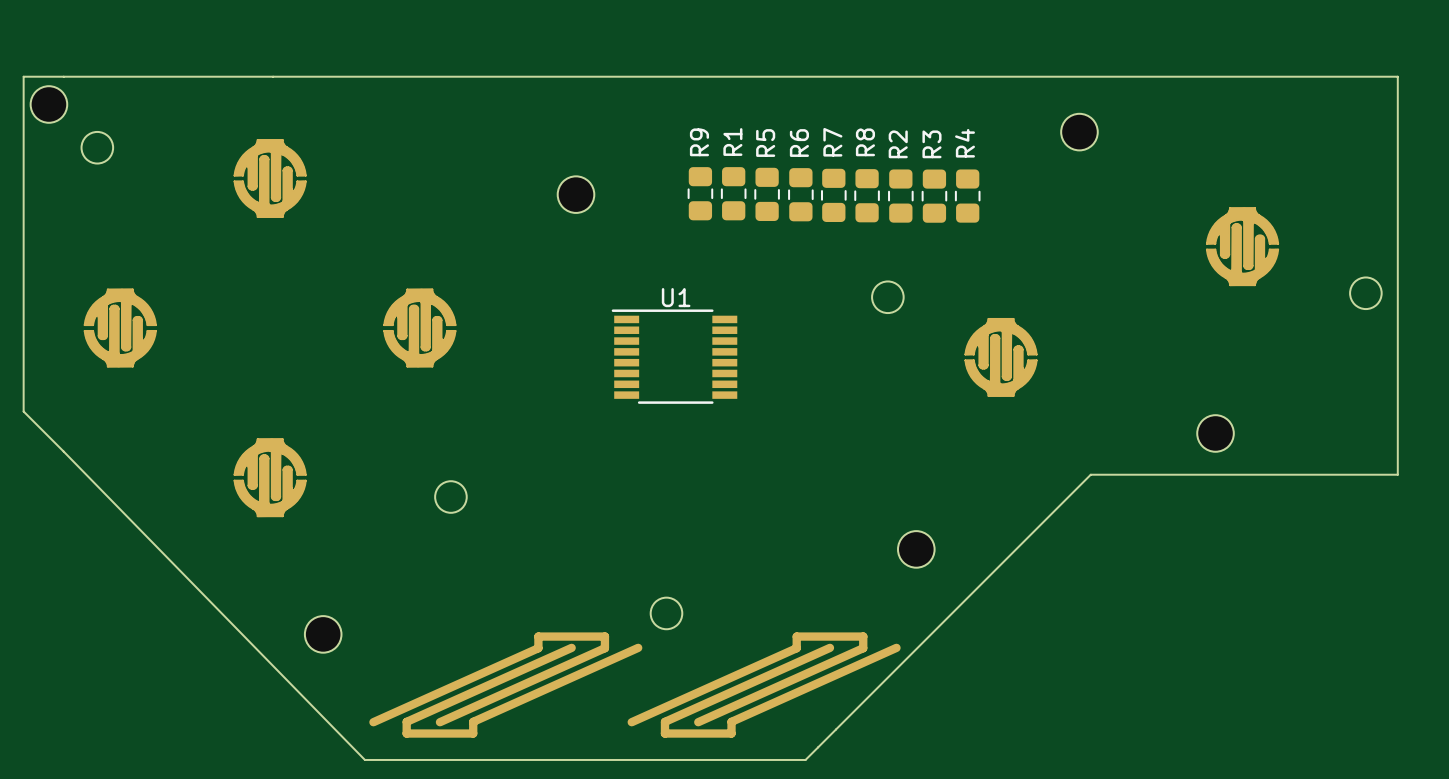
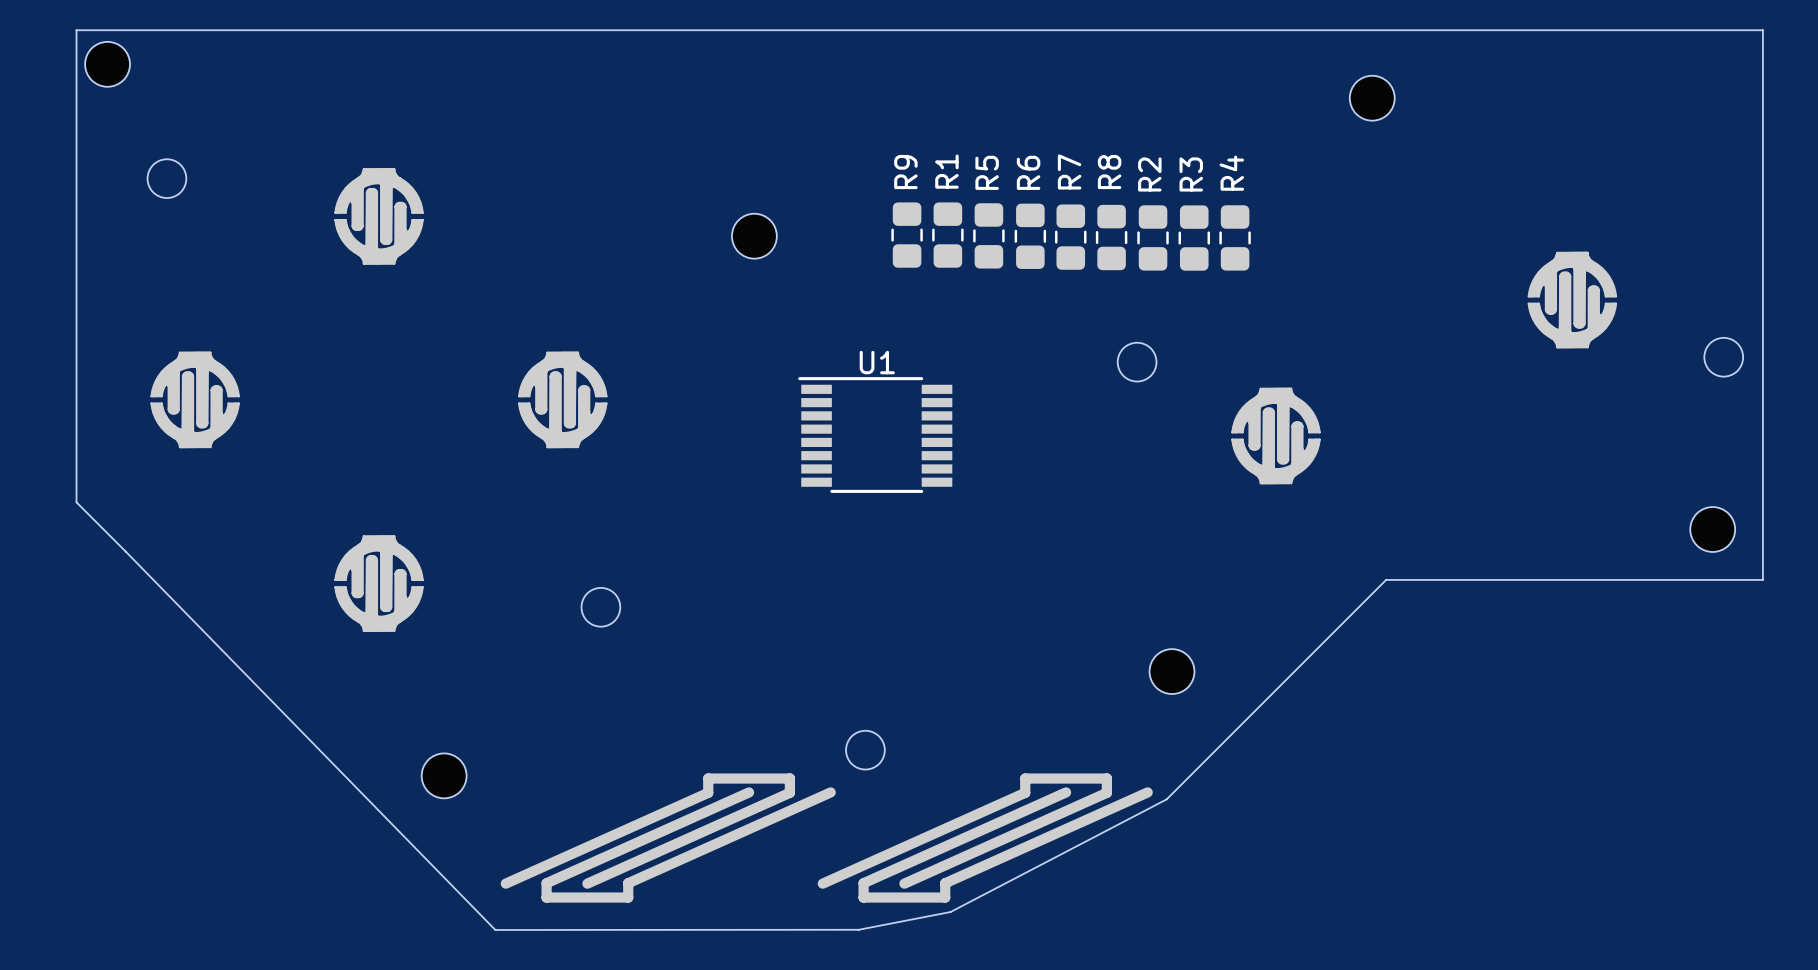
board edge: (23, 76) (1397, 76) -> (76, 91) (76, 30) (1762, 30) (1762, 91)
part position: (48, 104) -> (107, 64)
part position: (1079, 132) -> (1372, 98)
part position: (1215, 433) -> (1712, 529)
board edge: (911, 653) (805, 759) (364, 759) -> (1166, 799) (950, 912) (858, 929) (495, 929)

